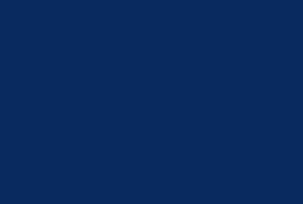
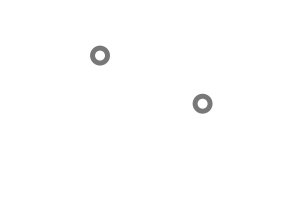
via: none -> (100, 55)
via: none -> (202, 103)

